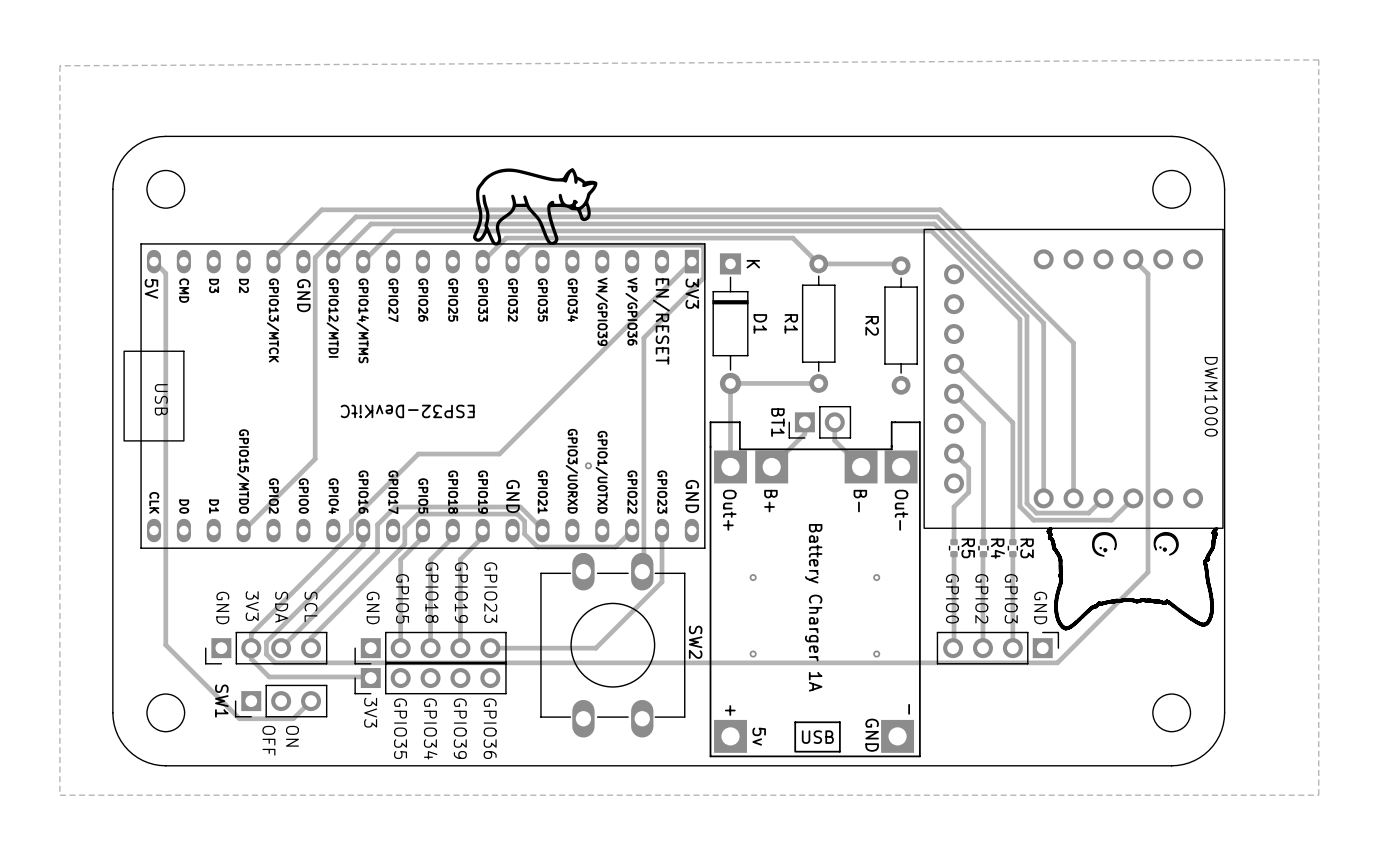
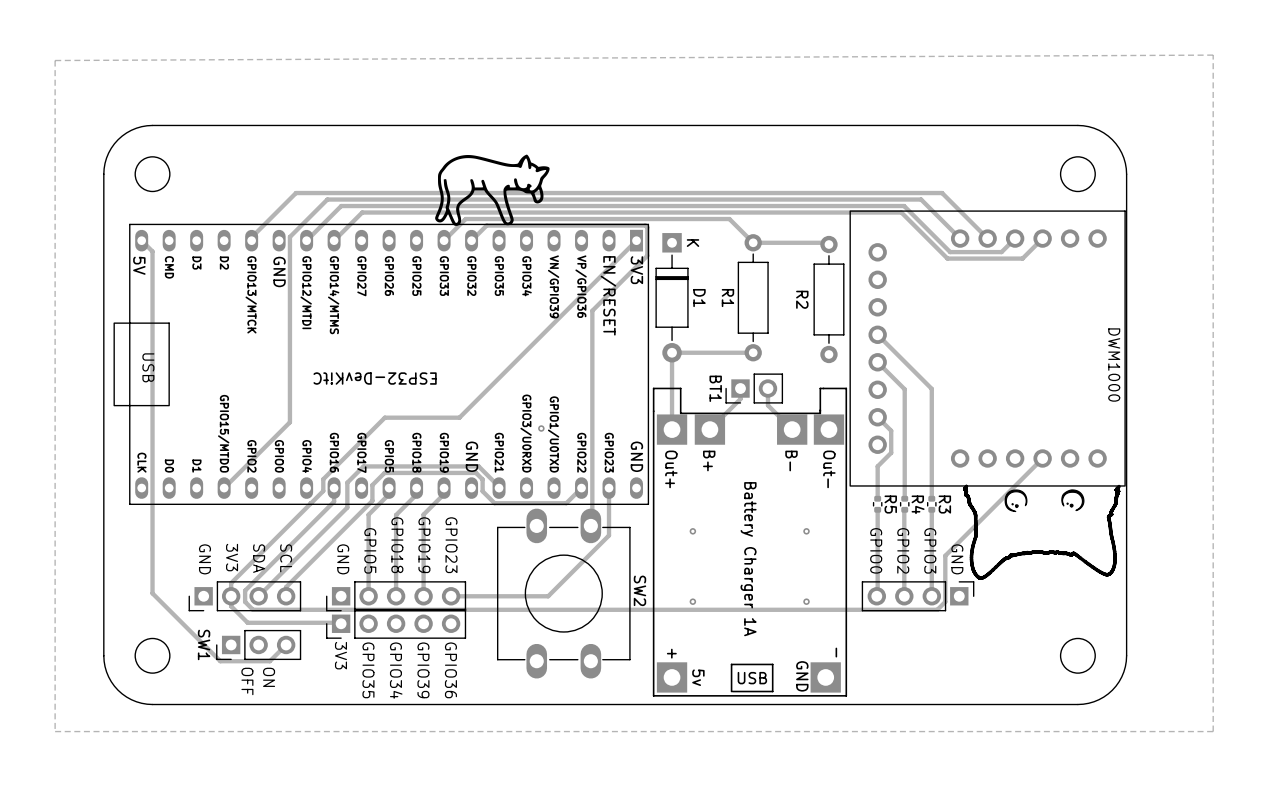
track: (940, 209) (1073, 343) (1073, 498) -> (865, 193) (942, 193) (987, 238)
track: (937, 216) (1043, 323) (1043, 498) -> (862, 199) (921, 199) (960, 238)
track: (934, 223) (1026, 316) (1026, 503) (1036, 513) (1088, 513) (1103, 498) -> (859, 206) (904, 206) (950, 252) (1001, 252) (1015, 238)
track: (931, 231) (1019, 319) (1019, 506) (1033, 520) (1111, 520) -> (857, 212) (901, 212) (947, 258) (1022, 258) (1042, 238)
track: (1133, 259) (1148, 274) (1148, 572) (1057, 662) (1018, 662) -> (1022, 478) (945, 555) (945, 601) (937, 609)

